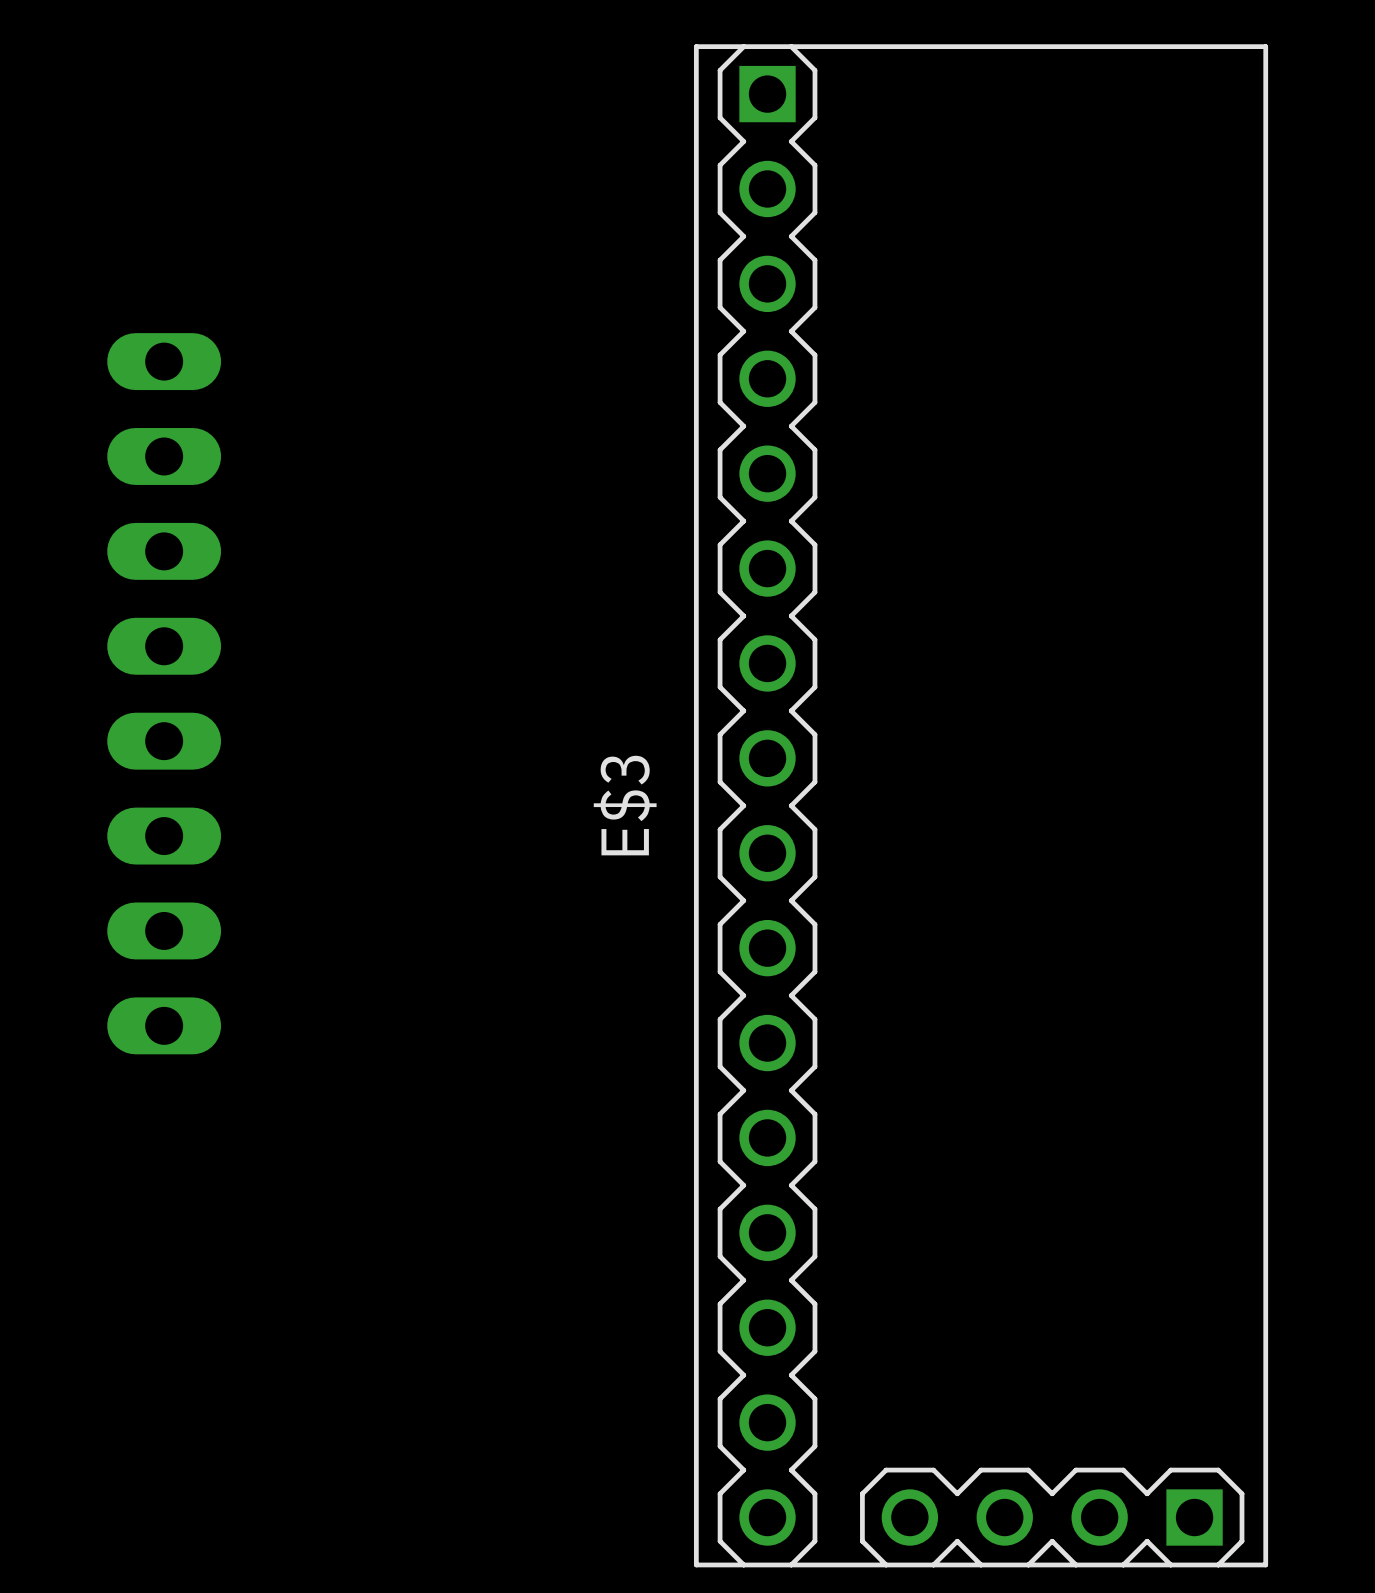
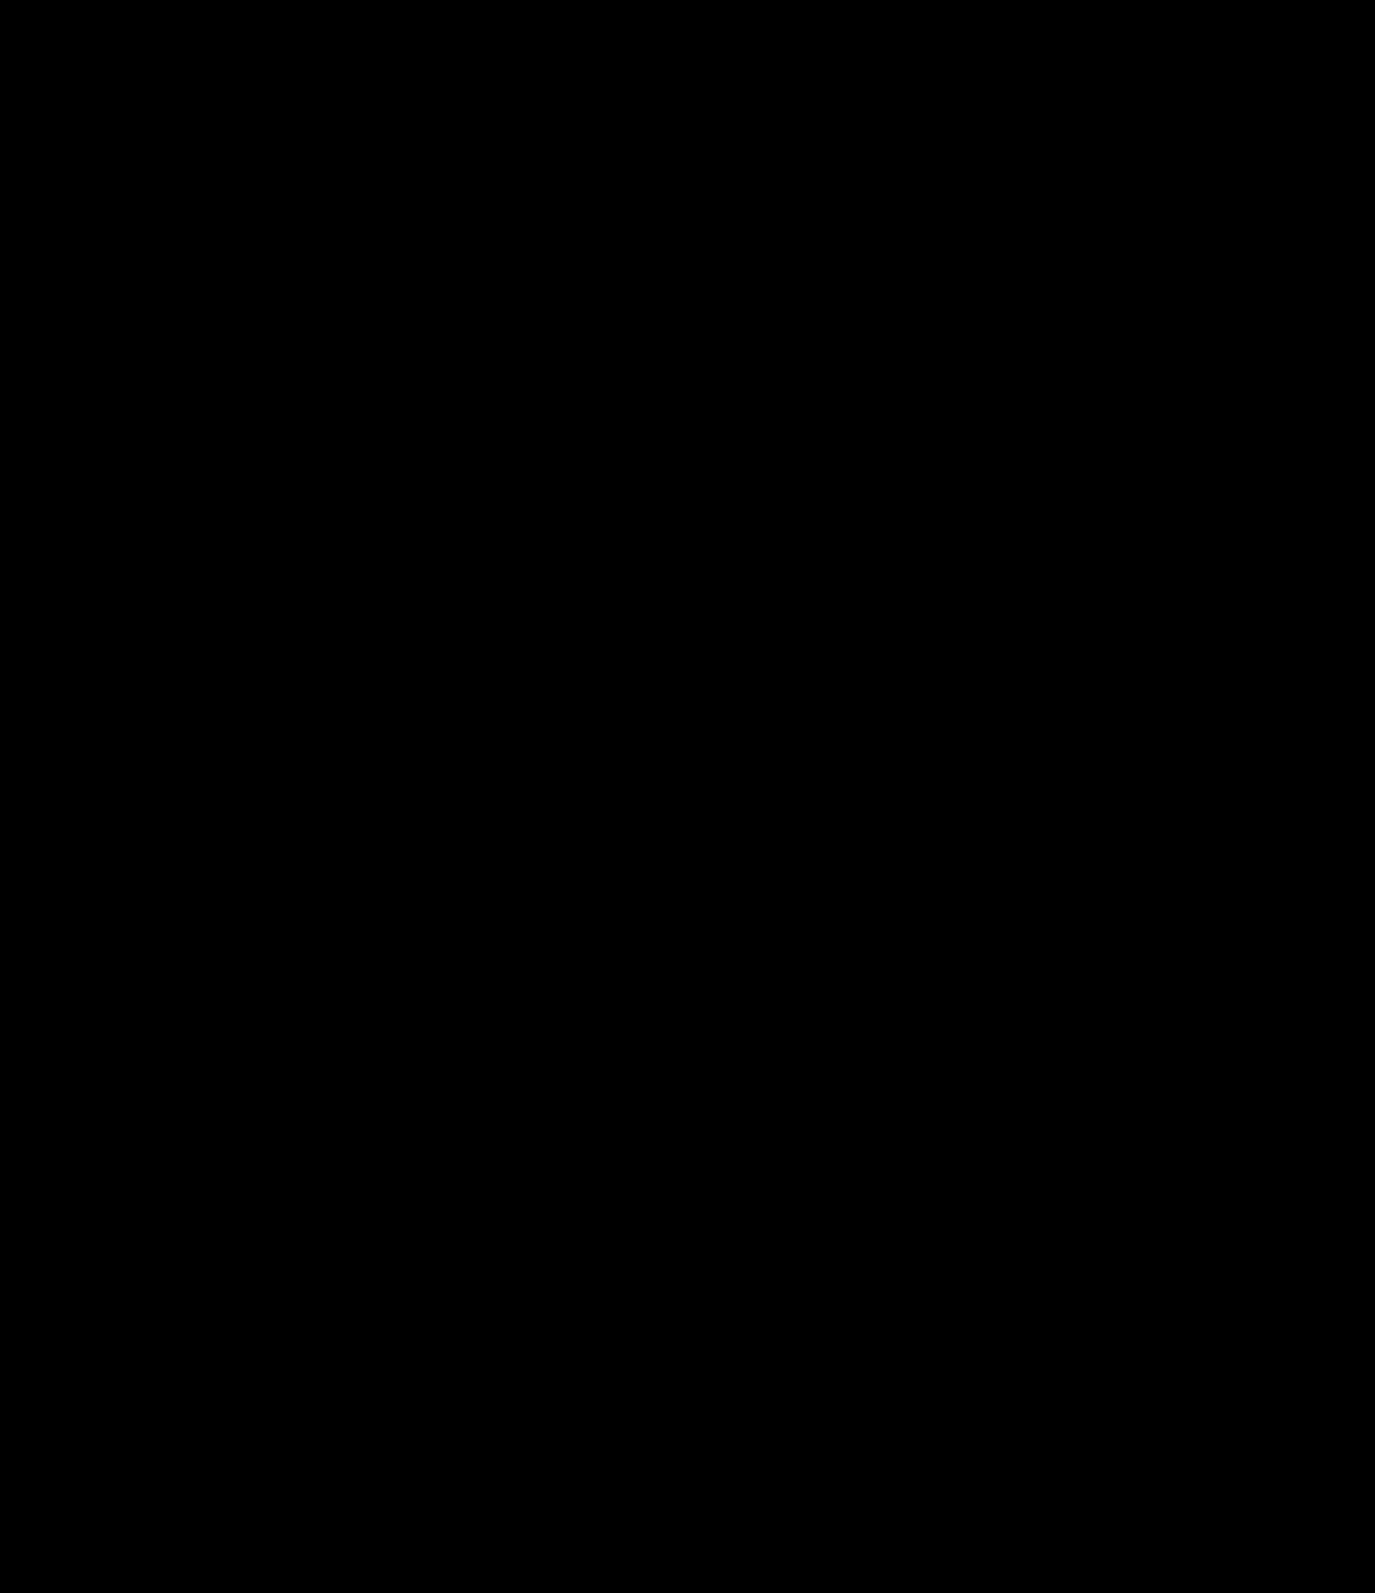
part: (164, 693) -> none
E$3: (981, 805) -> none

